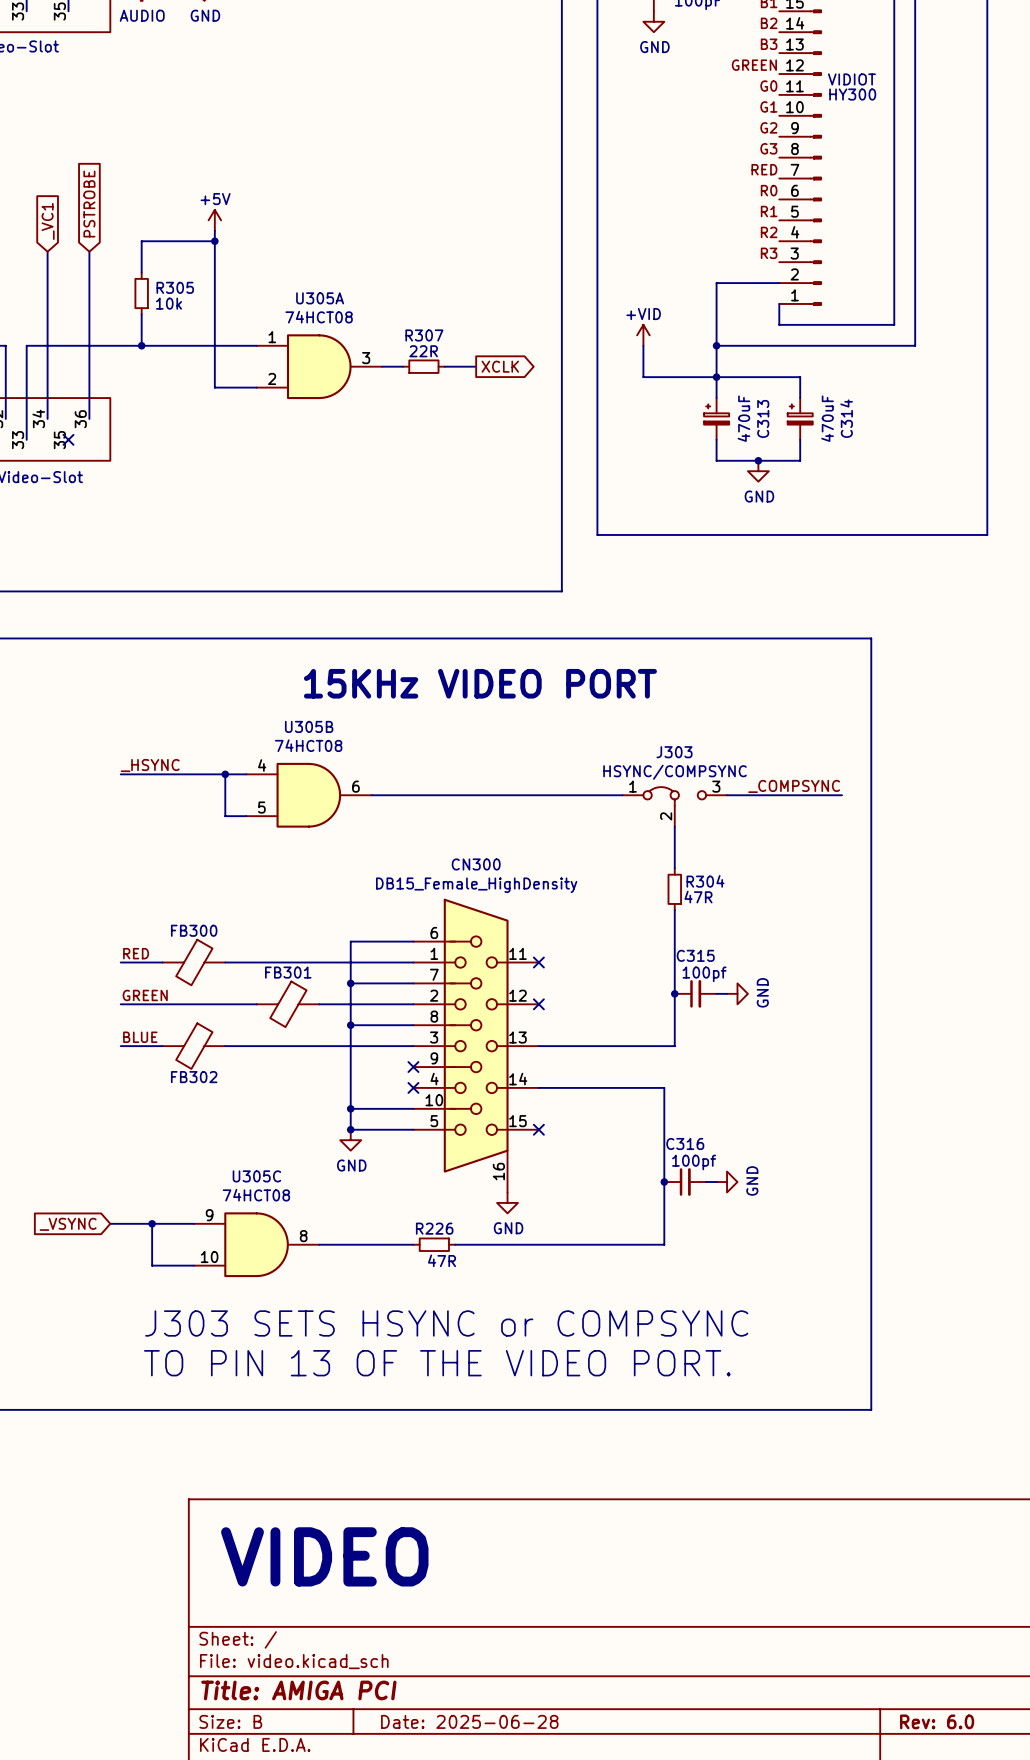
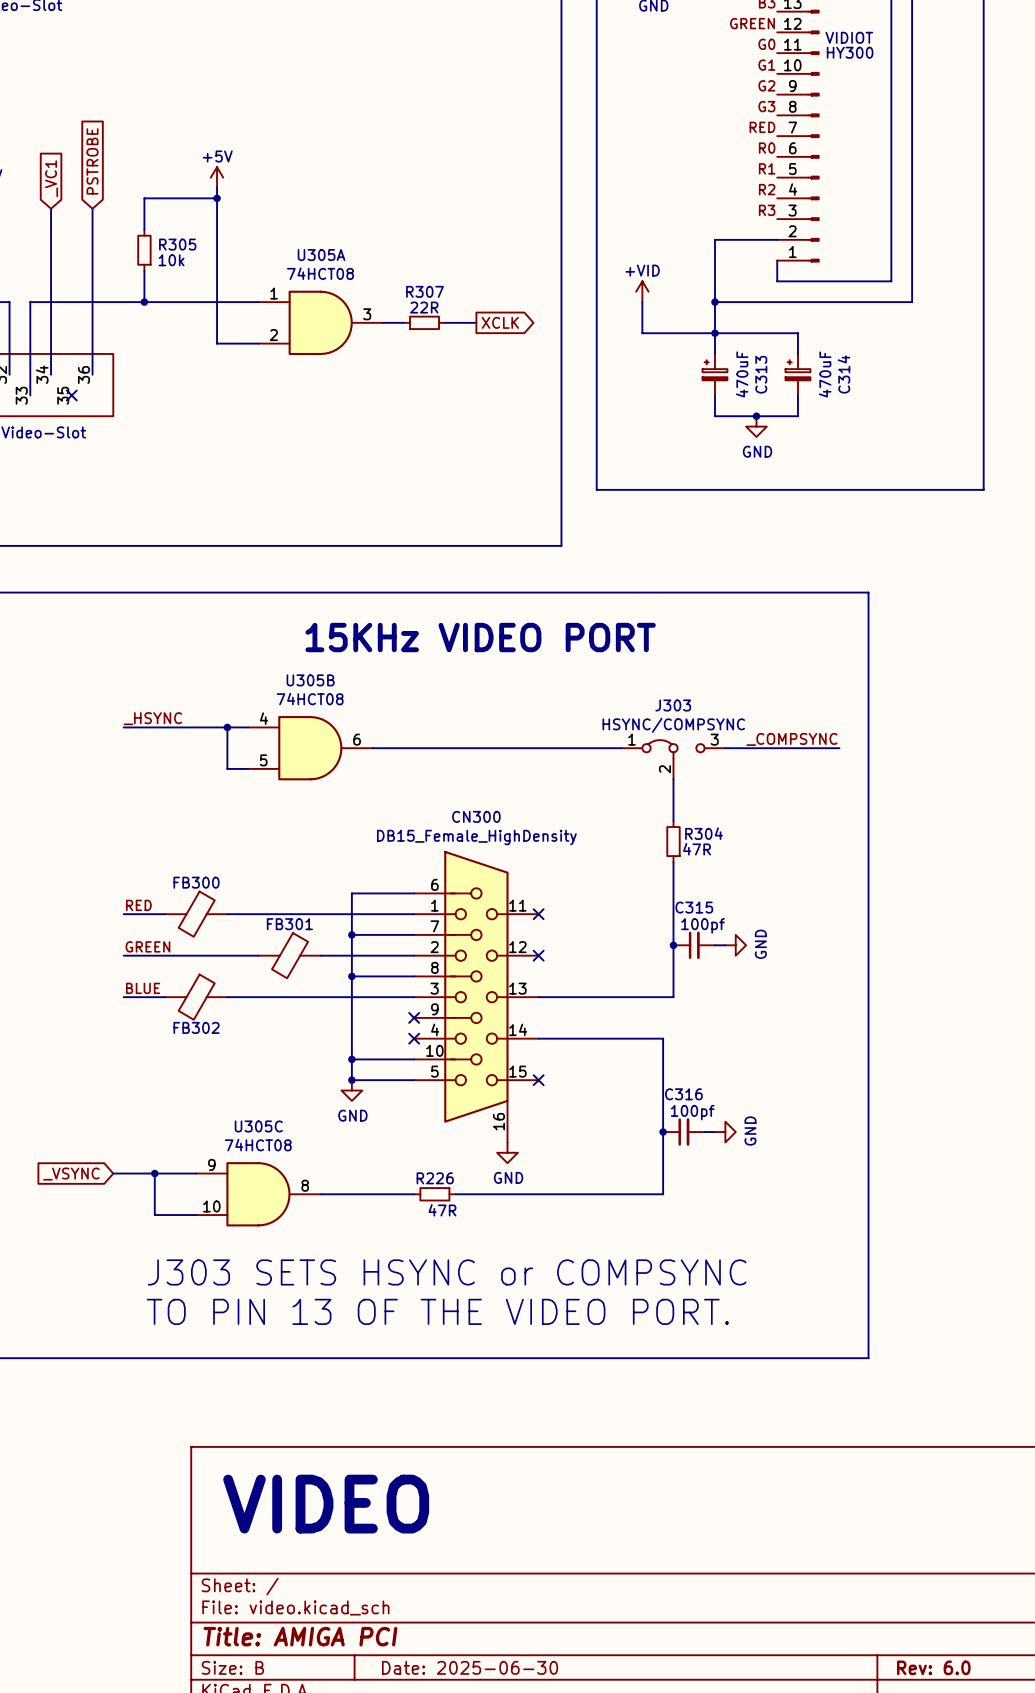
title block: Date: 2025-06-28 (469, 1721) -> Date: 2025-06-30 (470, 1667)

